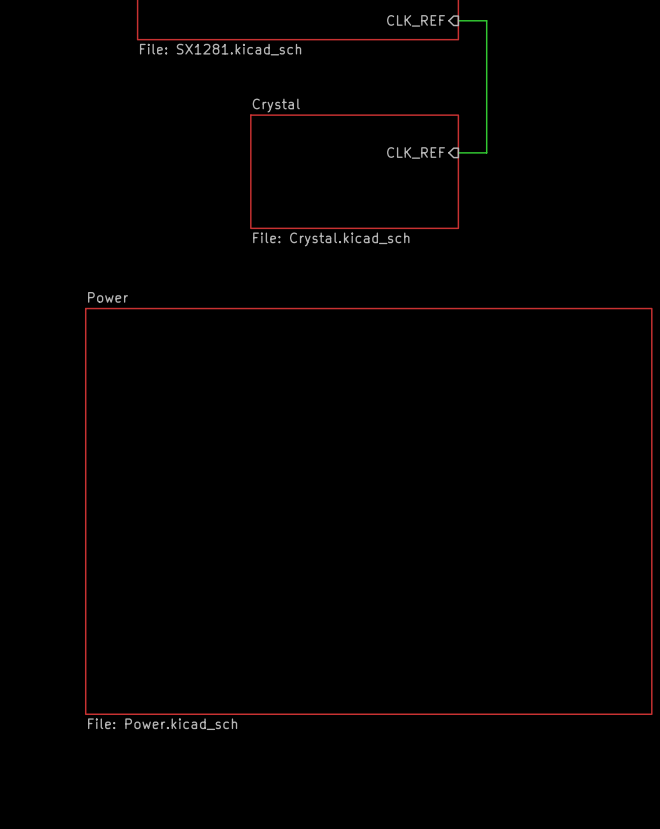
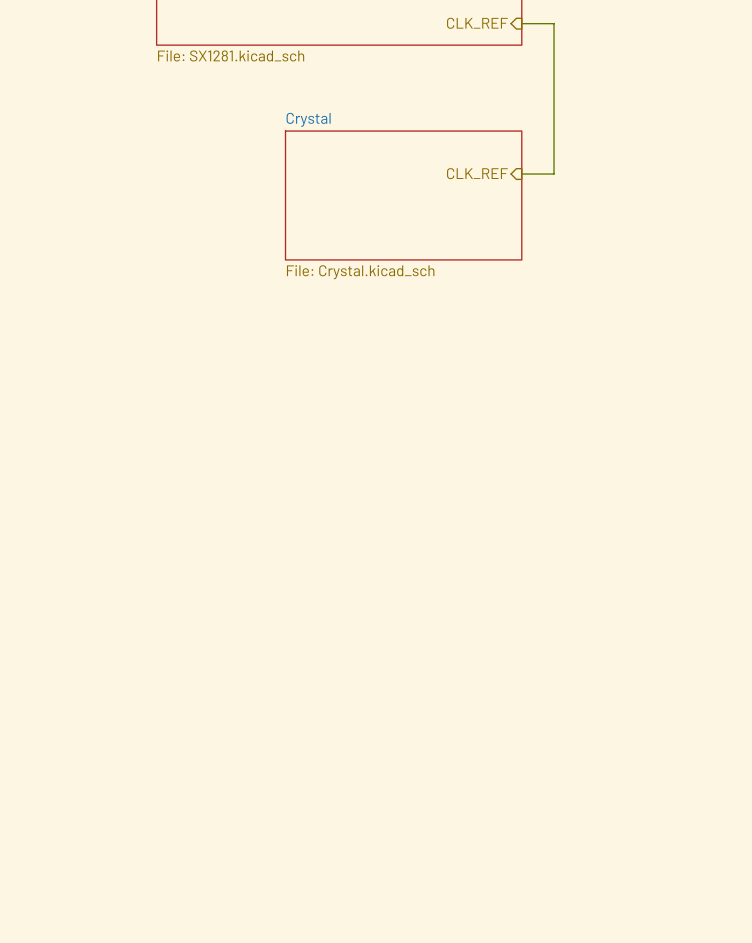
sheet Power: File: Power.kicad_sch (368, 511) -> none

